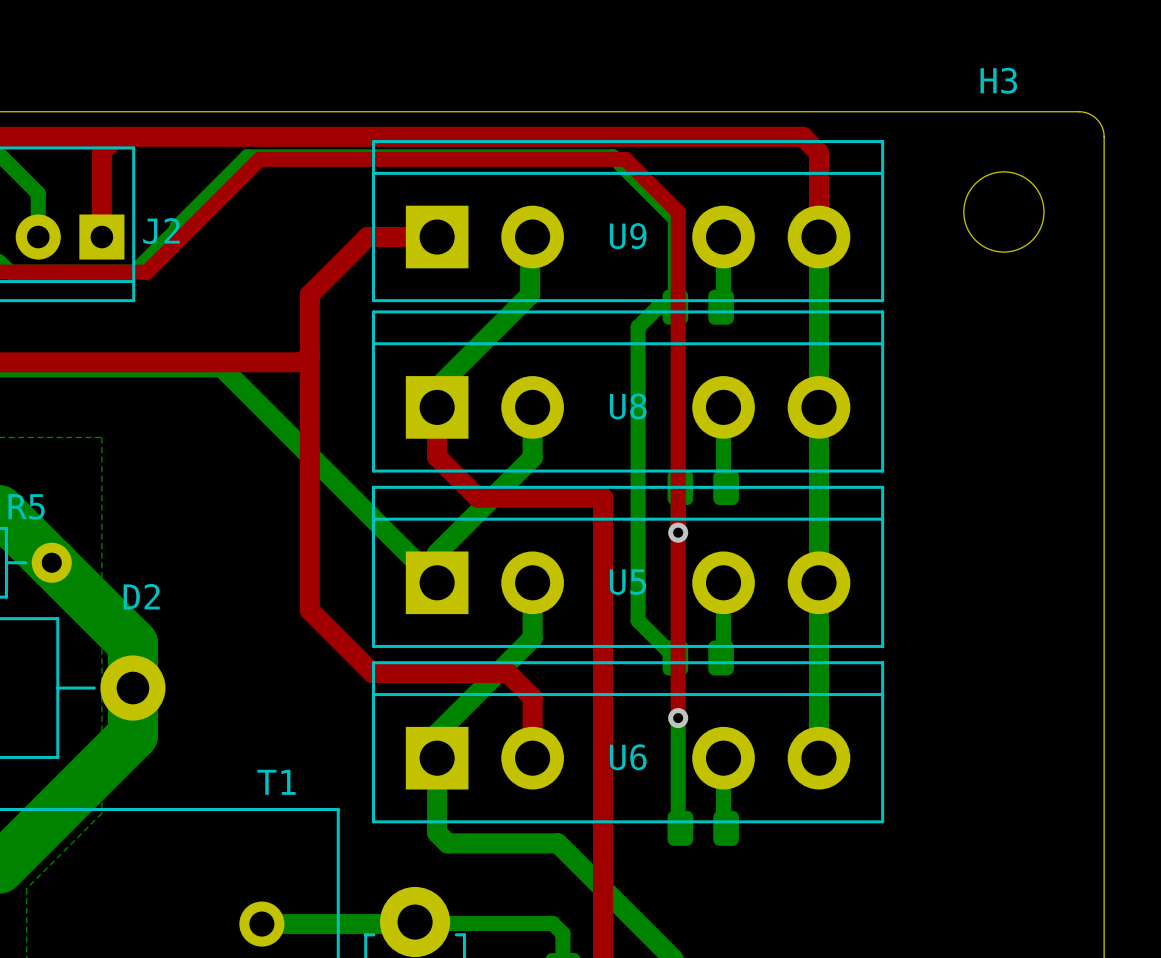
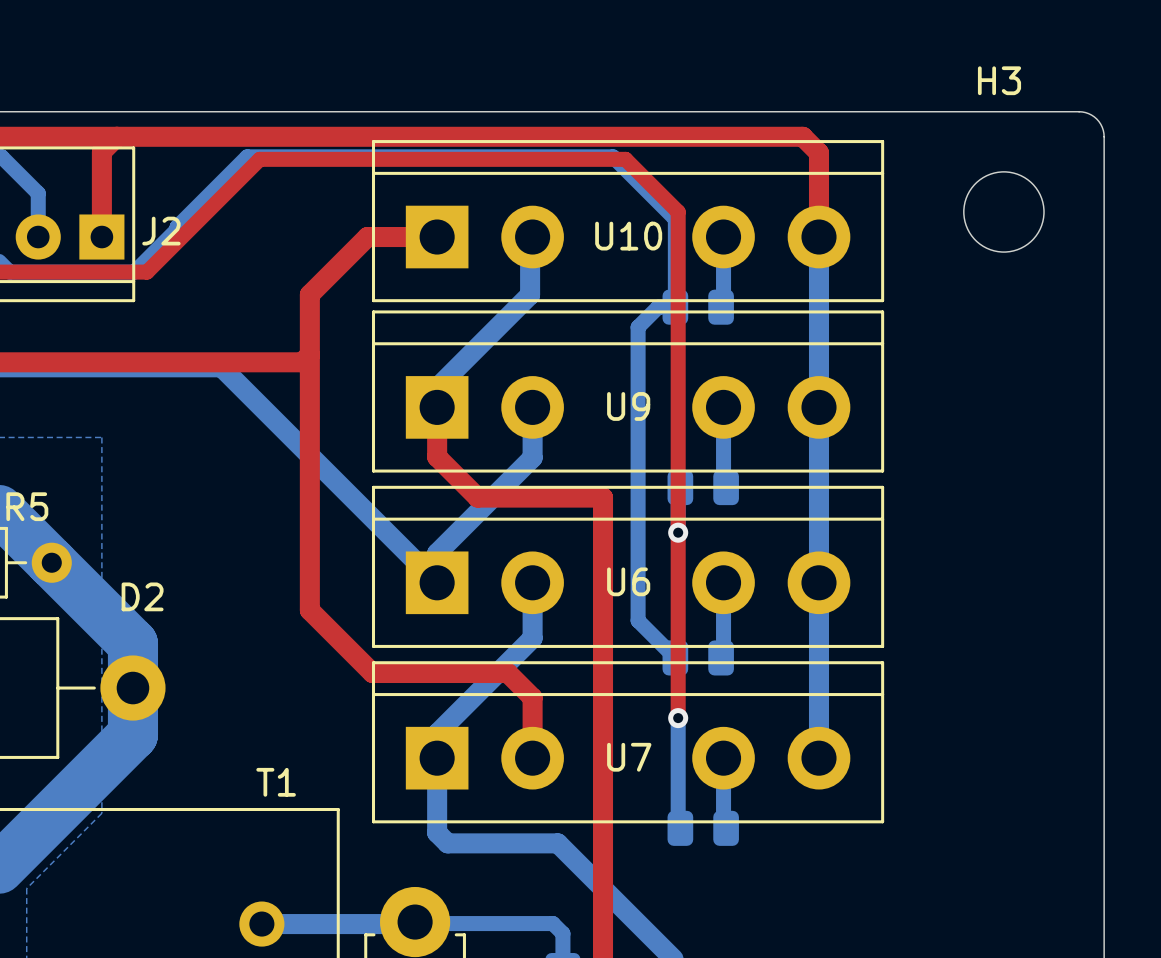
U9 name: U9 (628, 236) -> U10 (628, 236)
U8 name: U8 (628, 406) -> U9 (628, 406)
U5 name: U5 (627, 582) -> U6 (628, 581)
U6 name: U6 (628, 757) -> U7 (629, 757)

